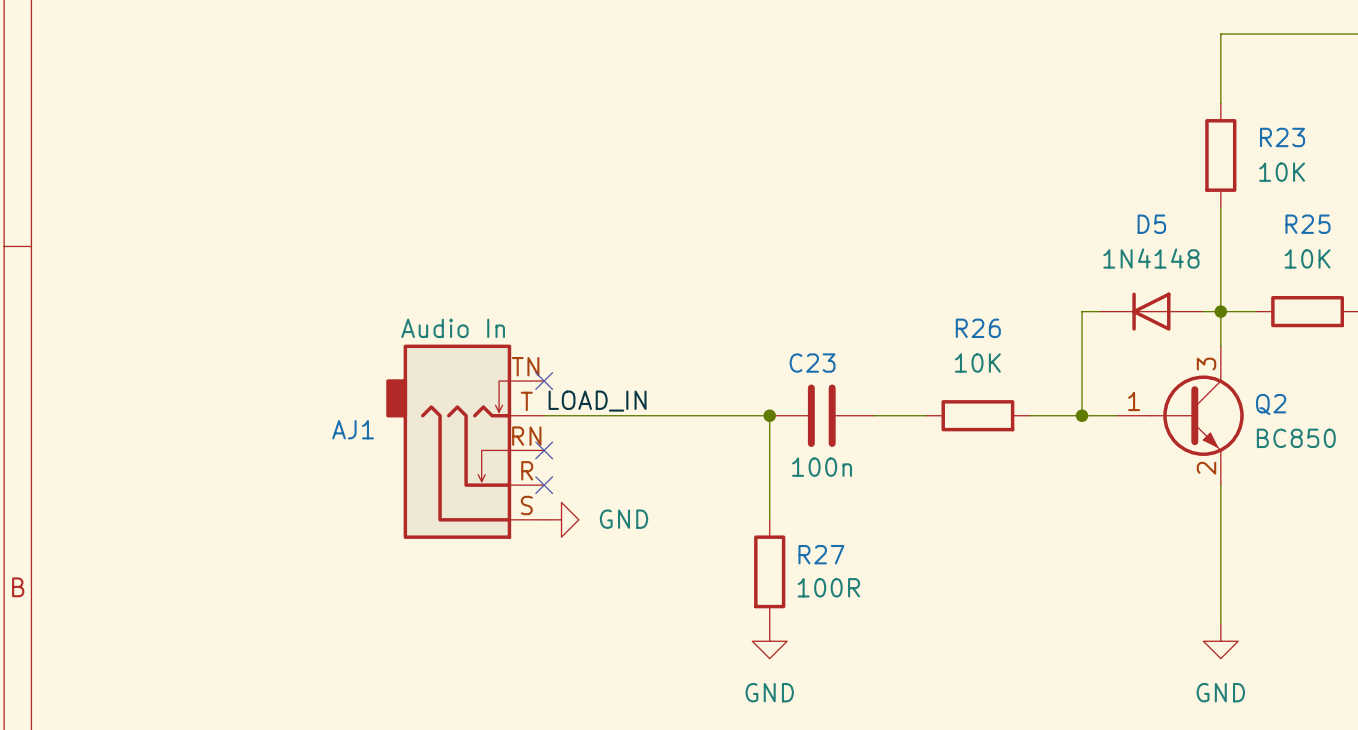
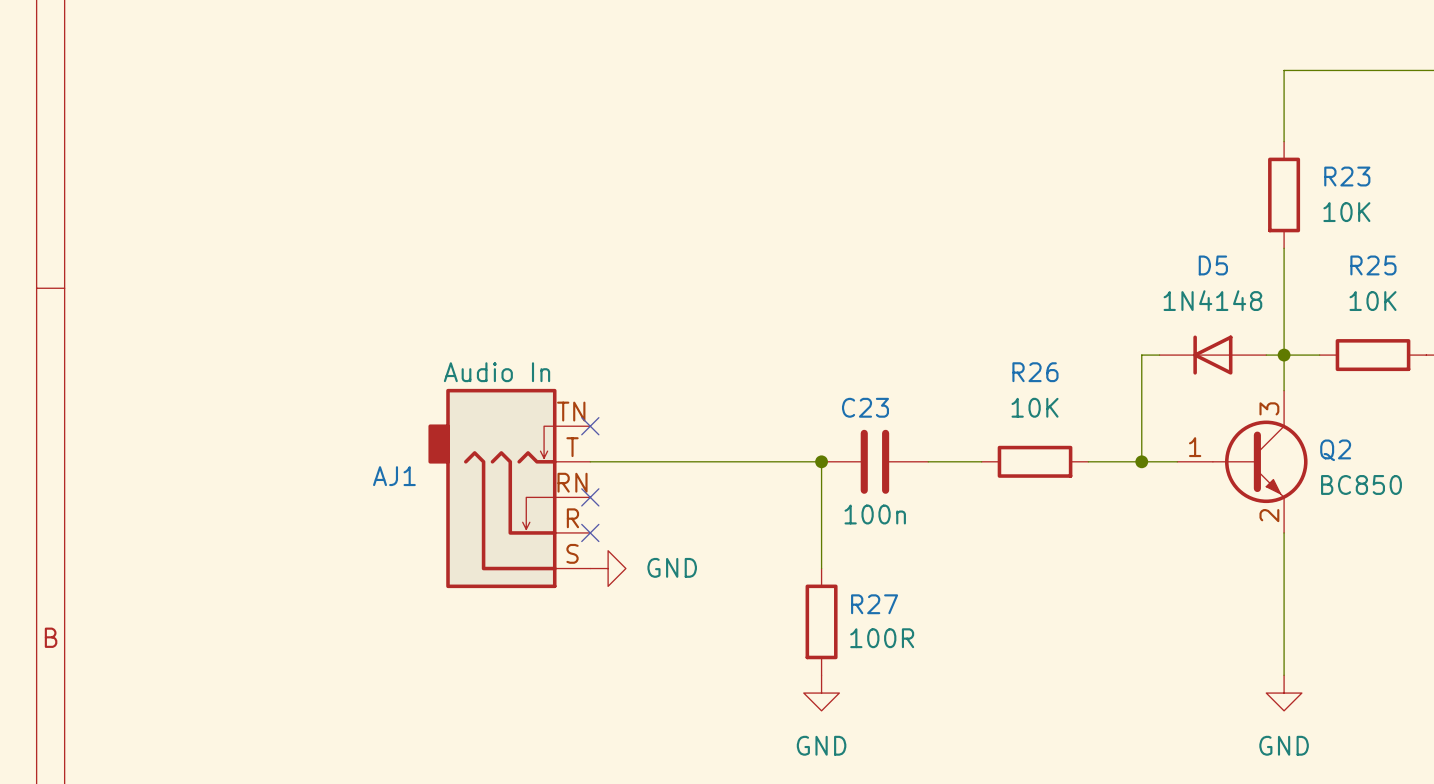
label: LOAD_IN (597, 401) -> none

